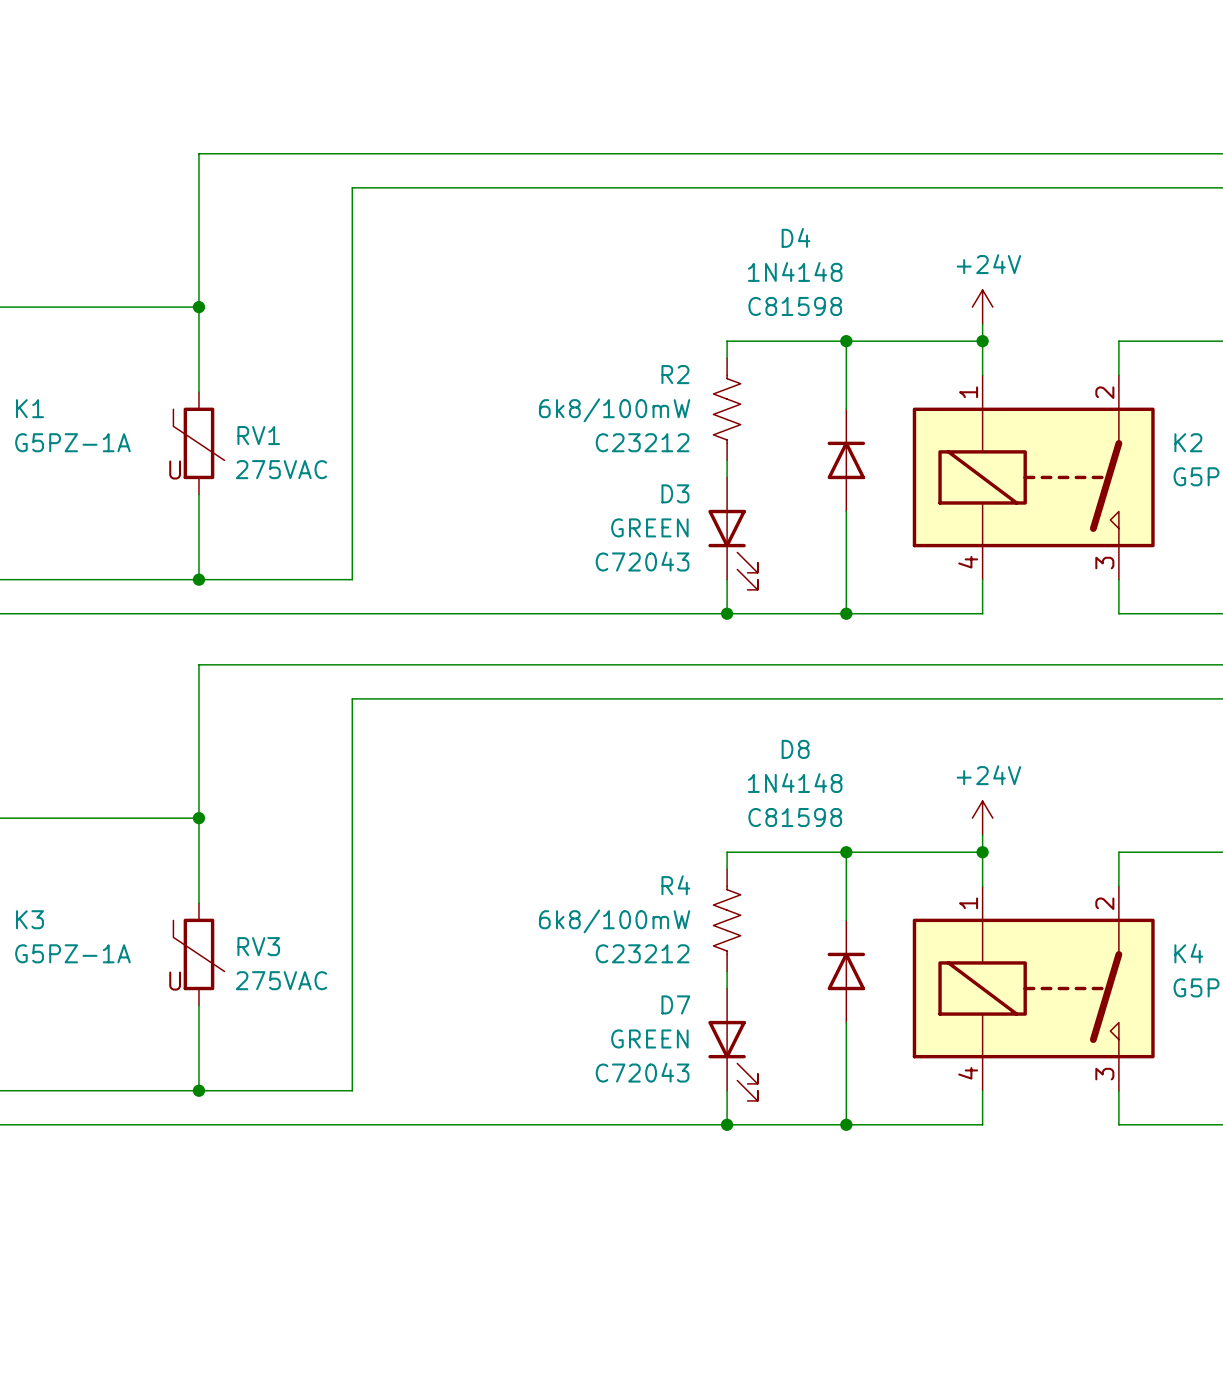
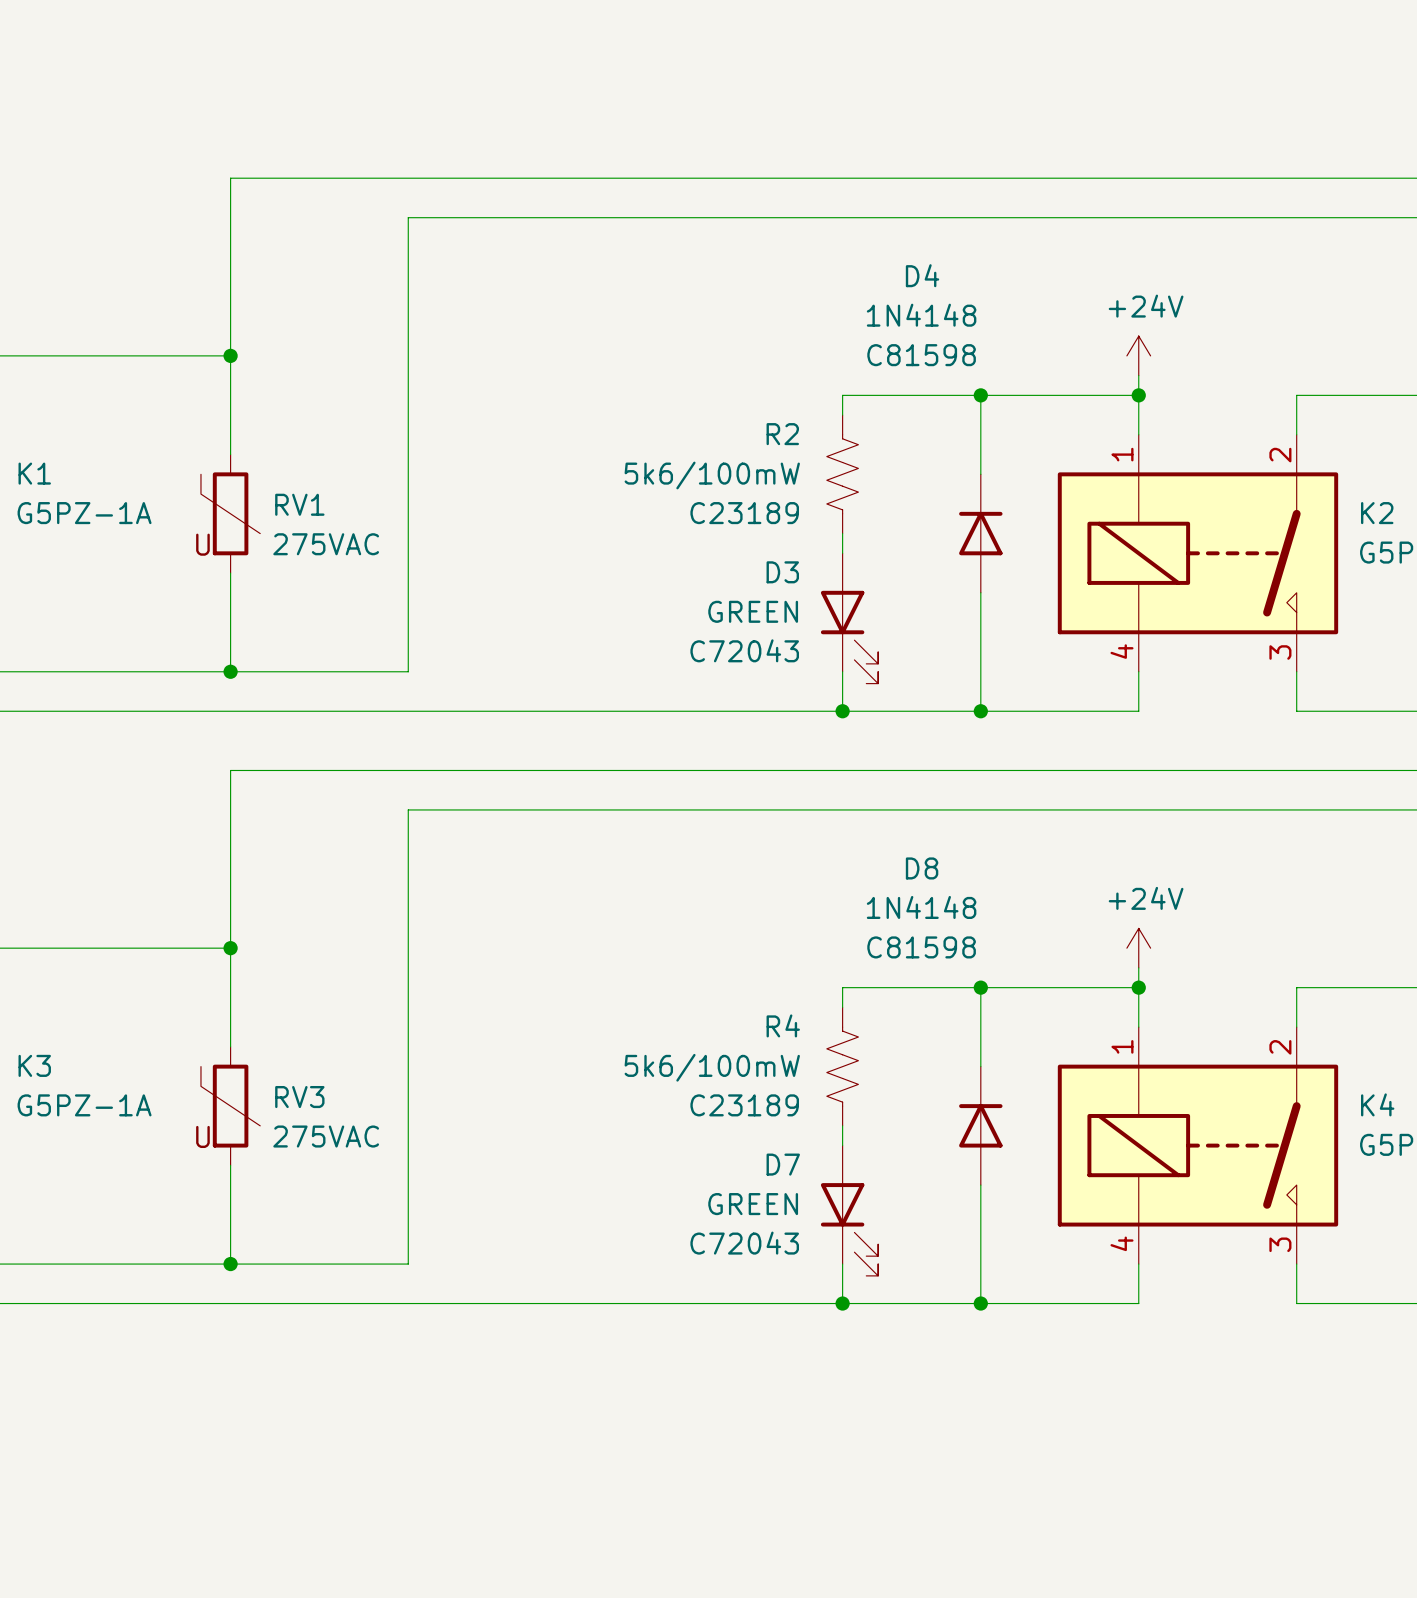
R2 value: 6k8/100mW (614, 410) -> 5k6/100mW (712, 475)
R2 text: C23212 (642, 442) -> C23189 (744, 513)
R4 value: 6k8/100mW (614, 921) -> 5k6/100mW (712, 1067)
R4 text: C23212 (642, 953) -> C23189 (744, 1105)

